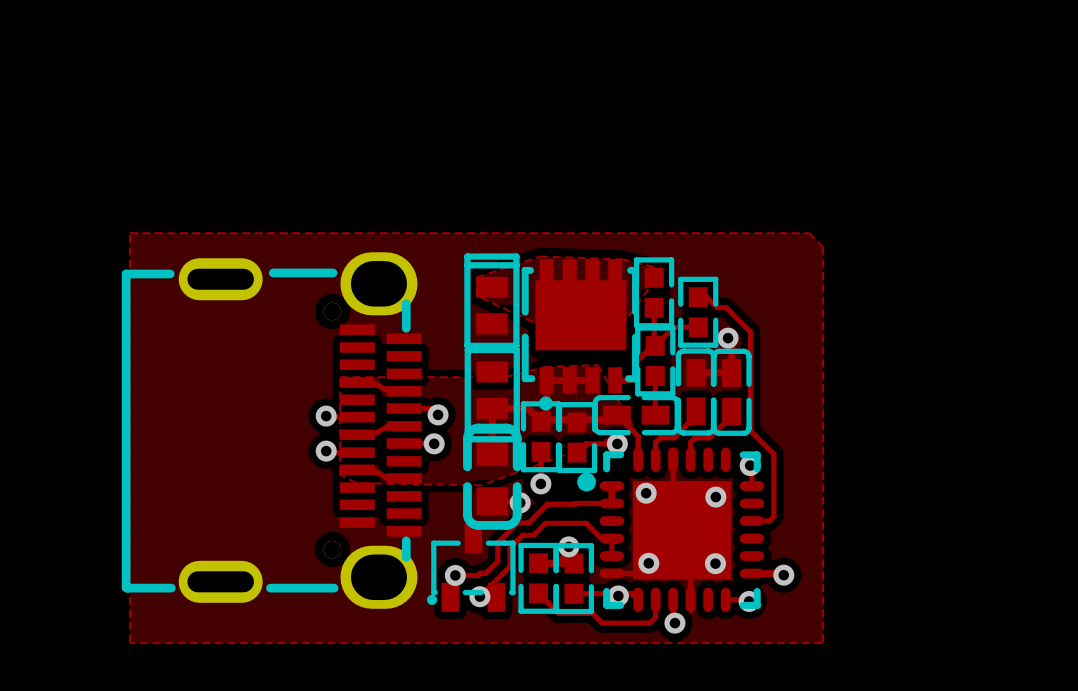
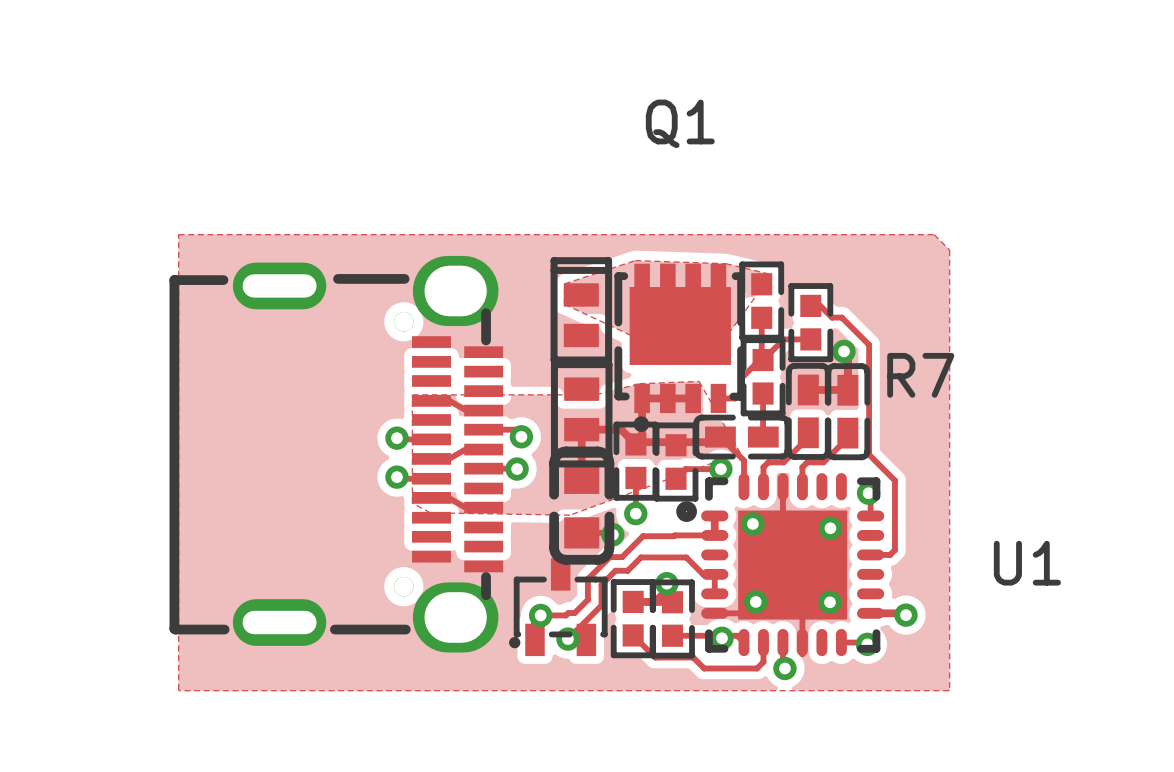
Q1 name: none -> Q1 (680, 123)
R7 name: none -> R7 (920, 375)
U1 name: none -> U1 (1027, 563)

